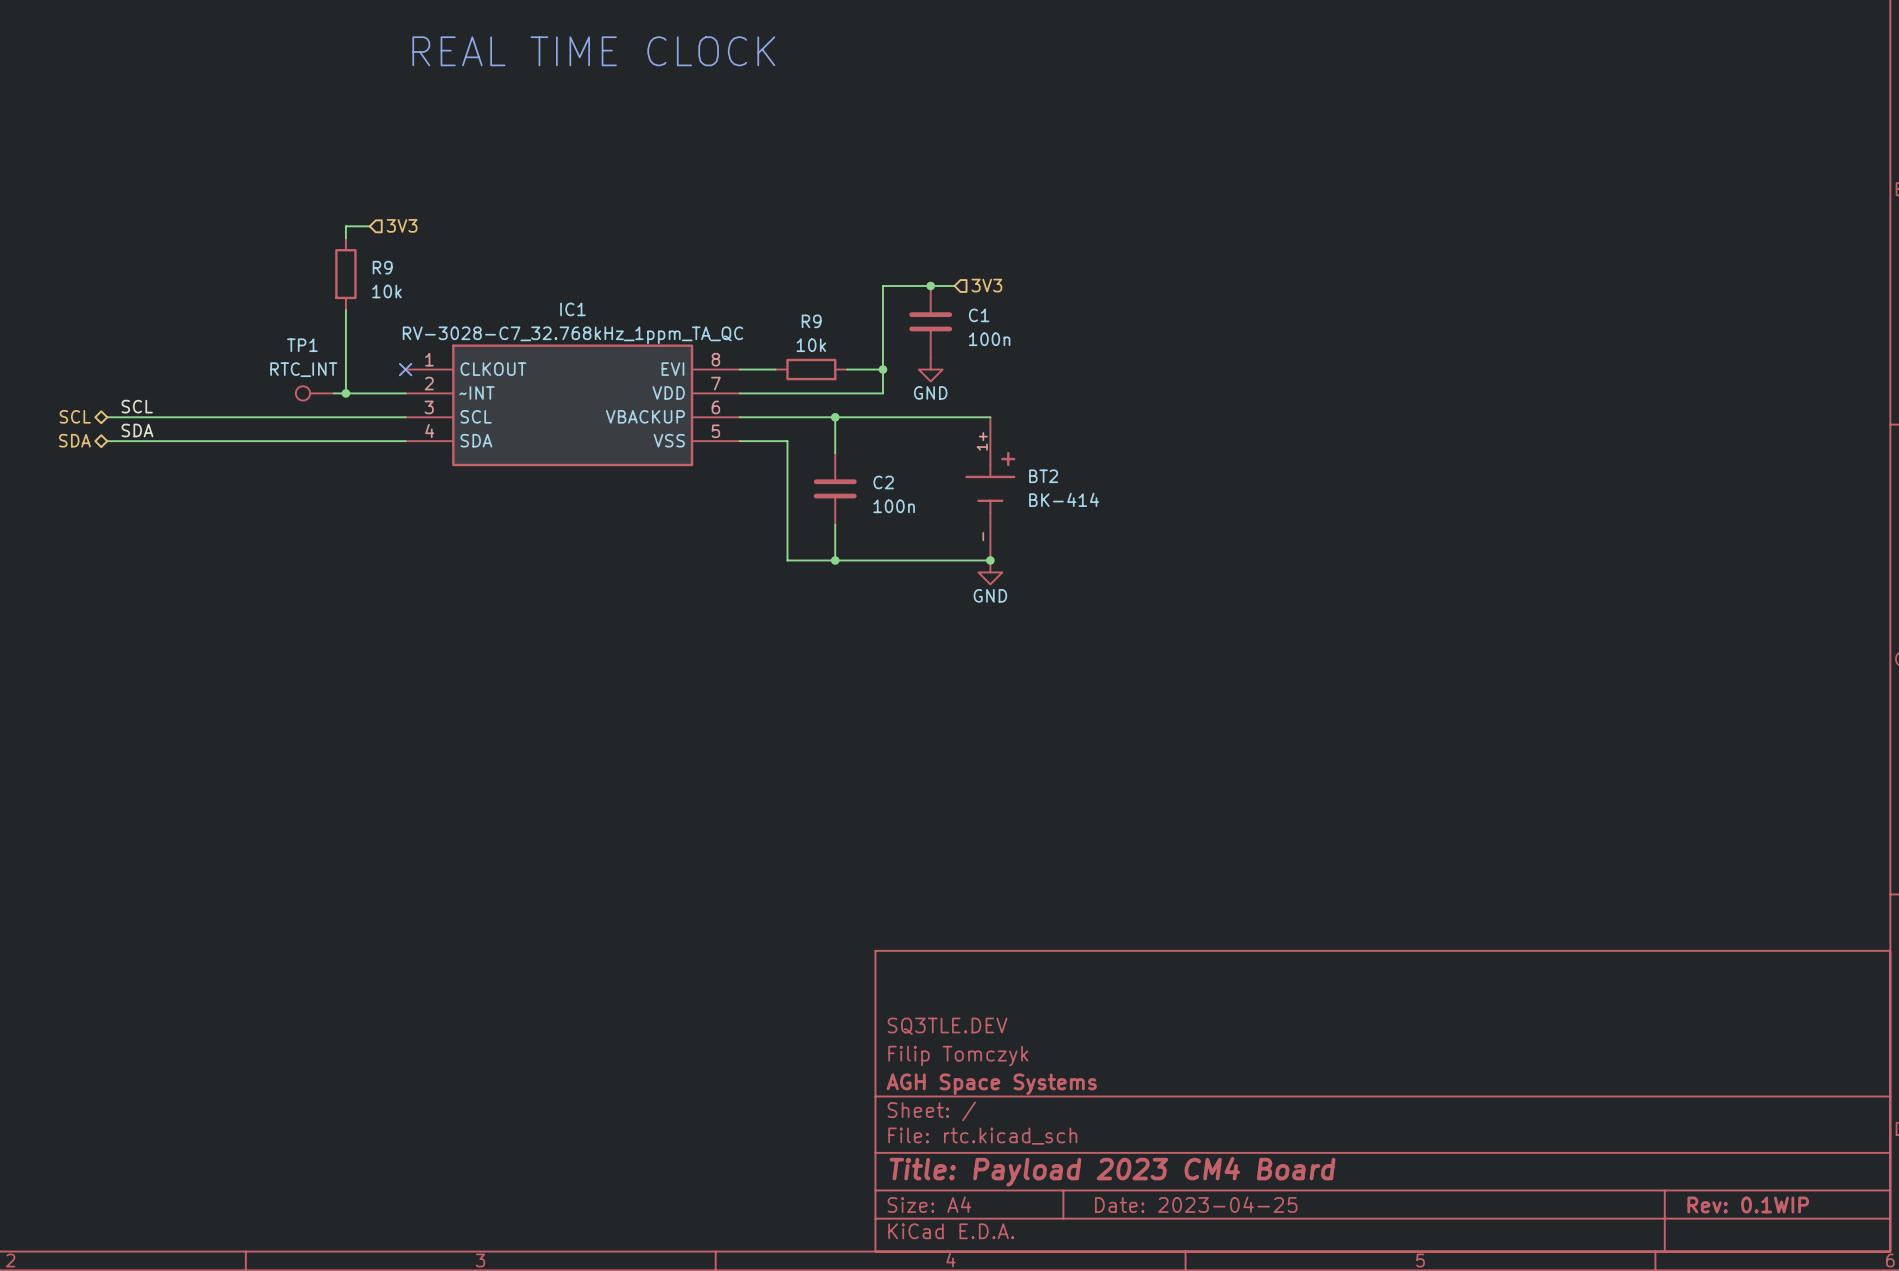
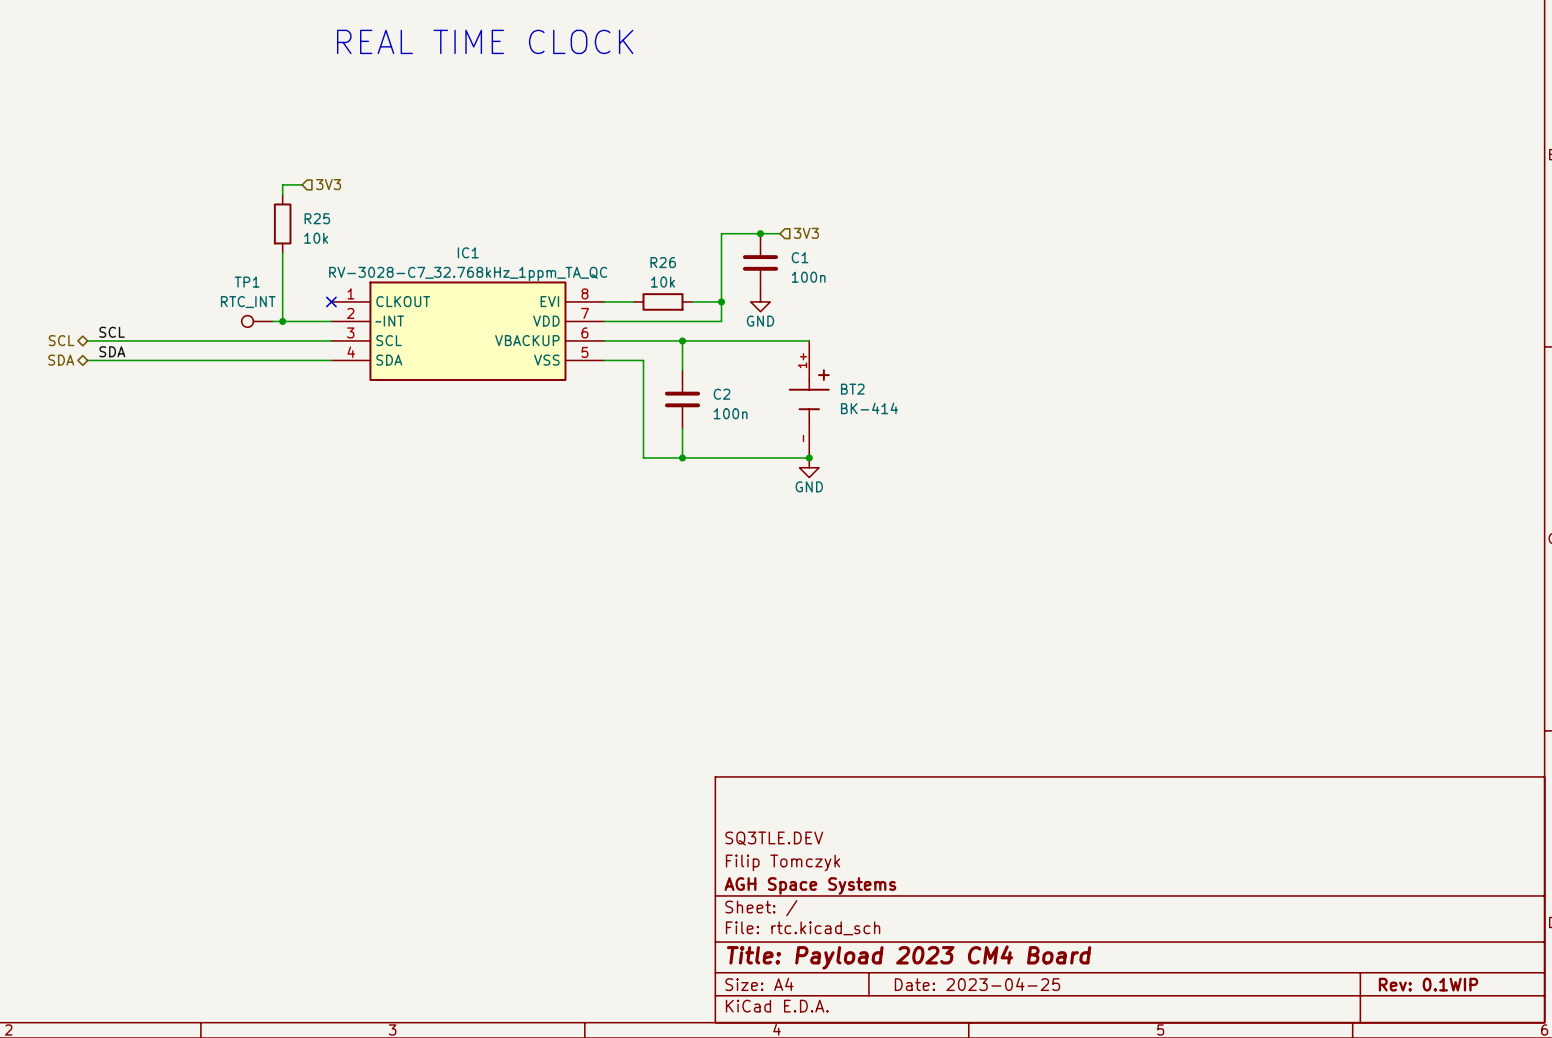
R9 name: R9 (382, 267) -> R25 (317, 218)
R9 name: R9 (811, 321) -> R26 (663, 262)

